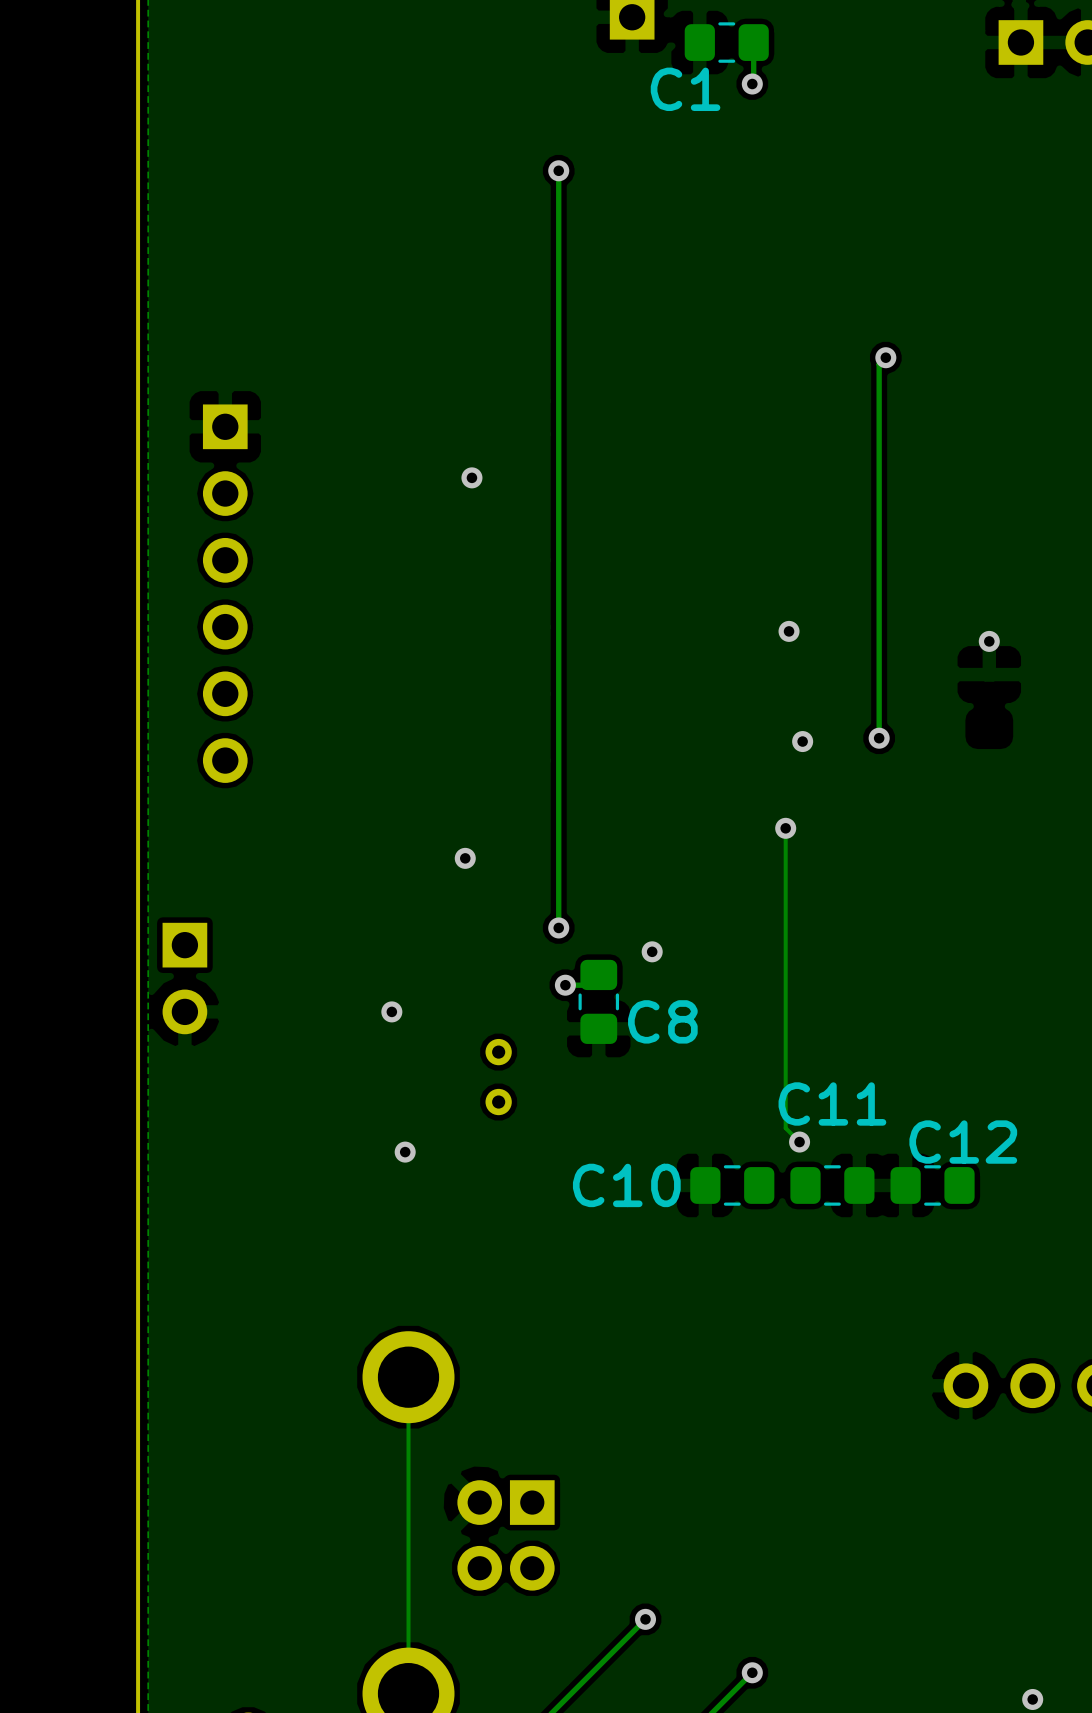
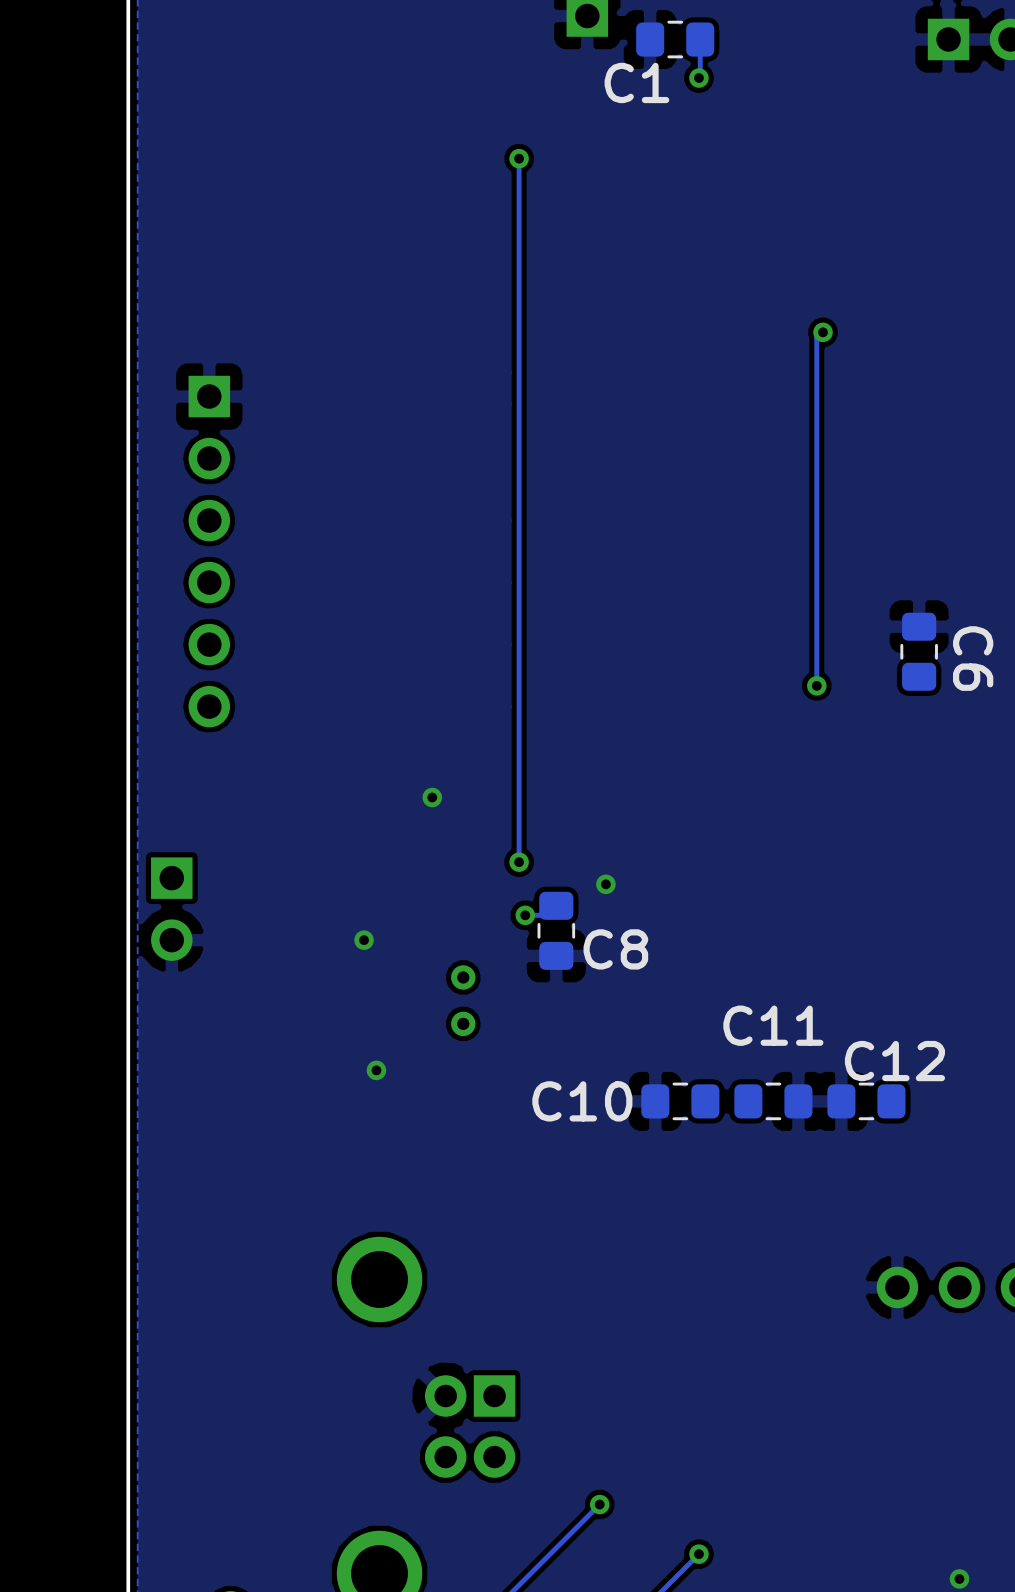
via: (471, 477) -> none
via: (789, 631) -> none
via: (989, 641) -> none
C6: none -> (919, 651)
via: (802, 741) -> none
track: (785, 828) (785, 1128) (799, 1142) -> none
via: (785, 828) -> none
via: (799, 1142) -> none
track: (408, 1377) (408, 1693) -> none

